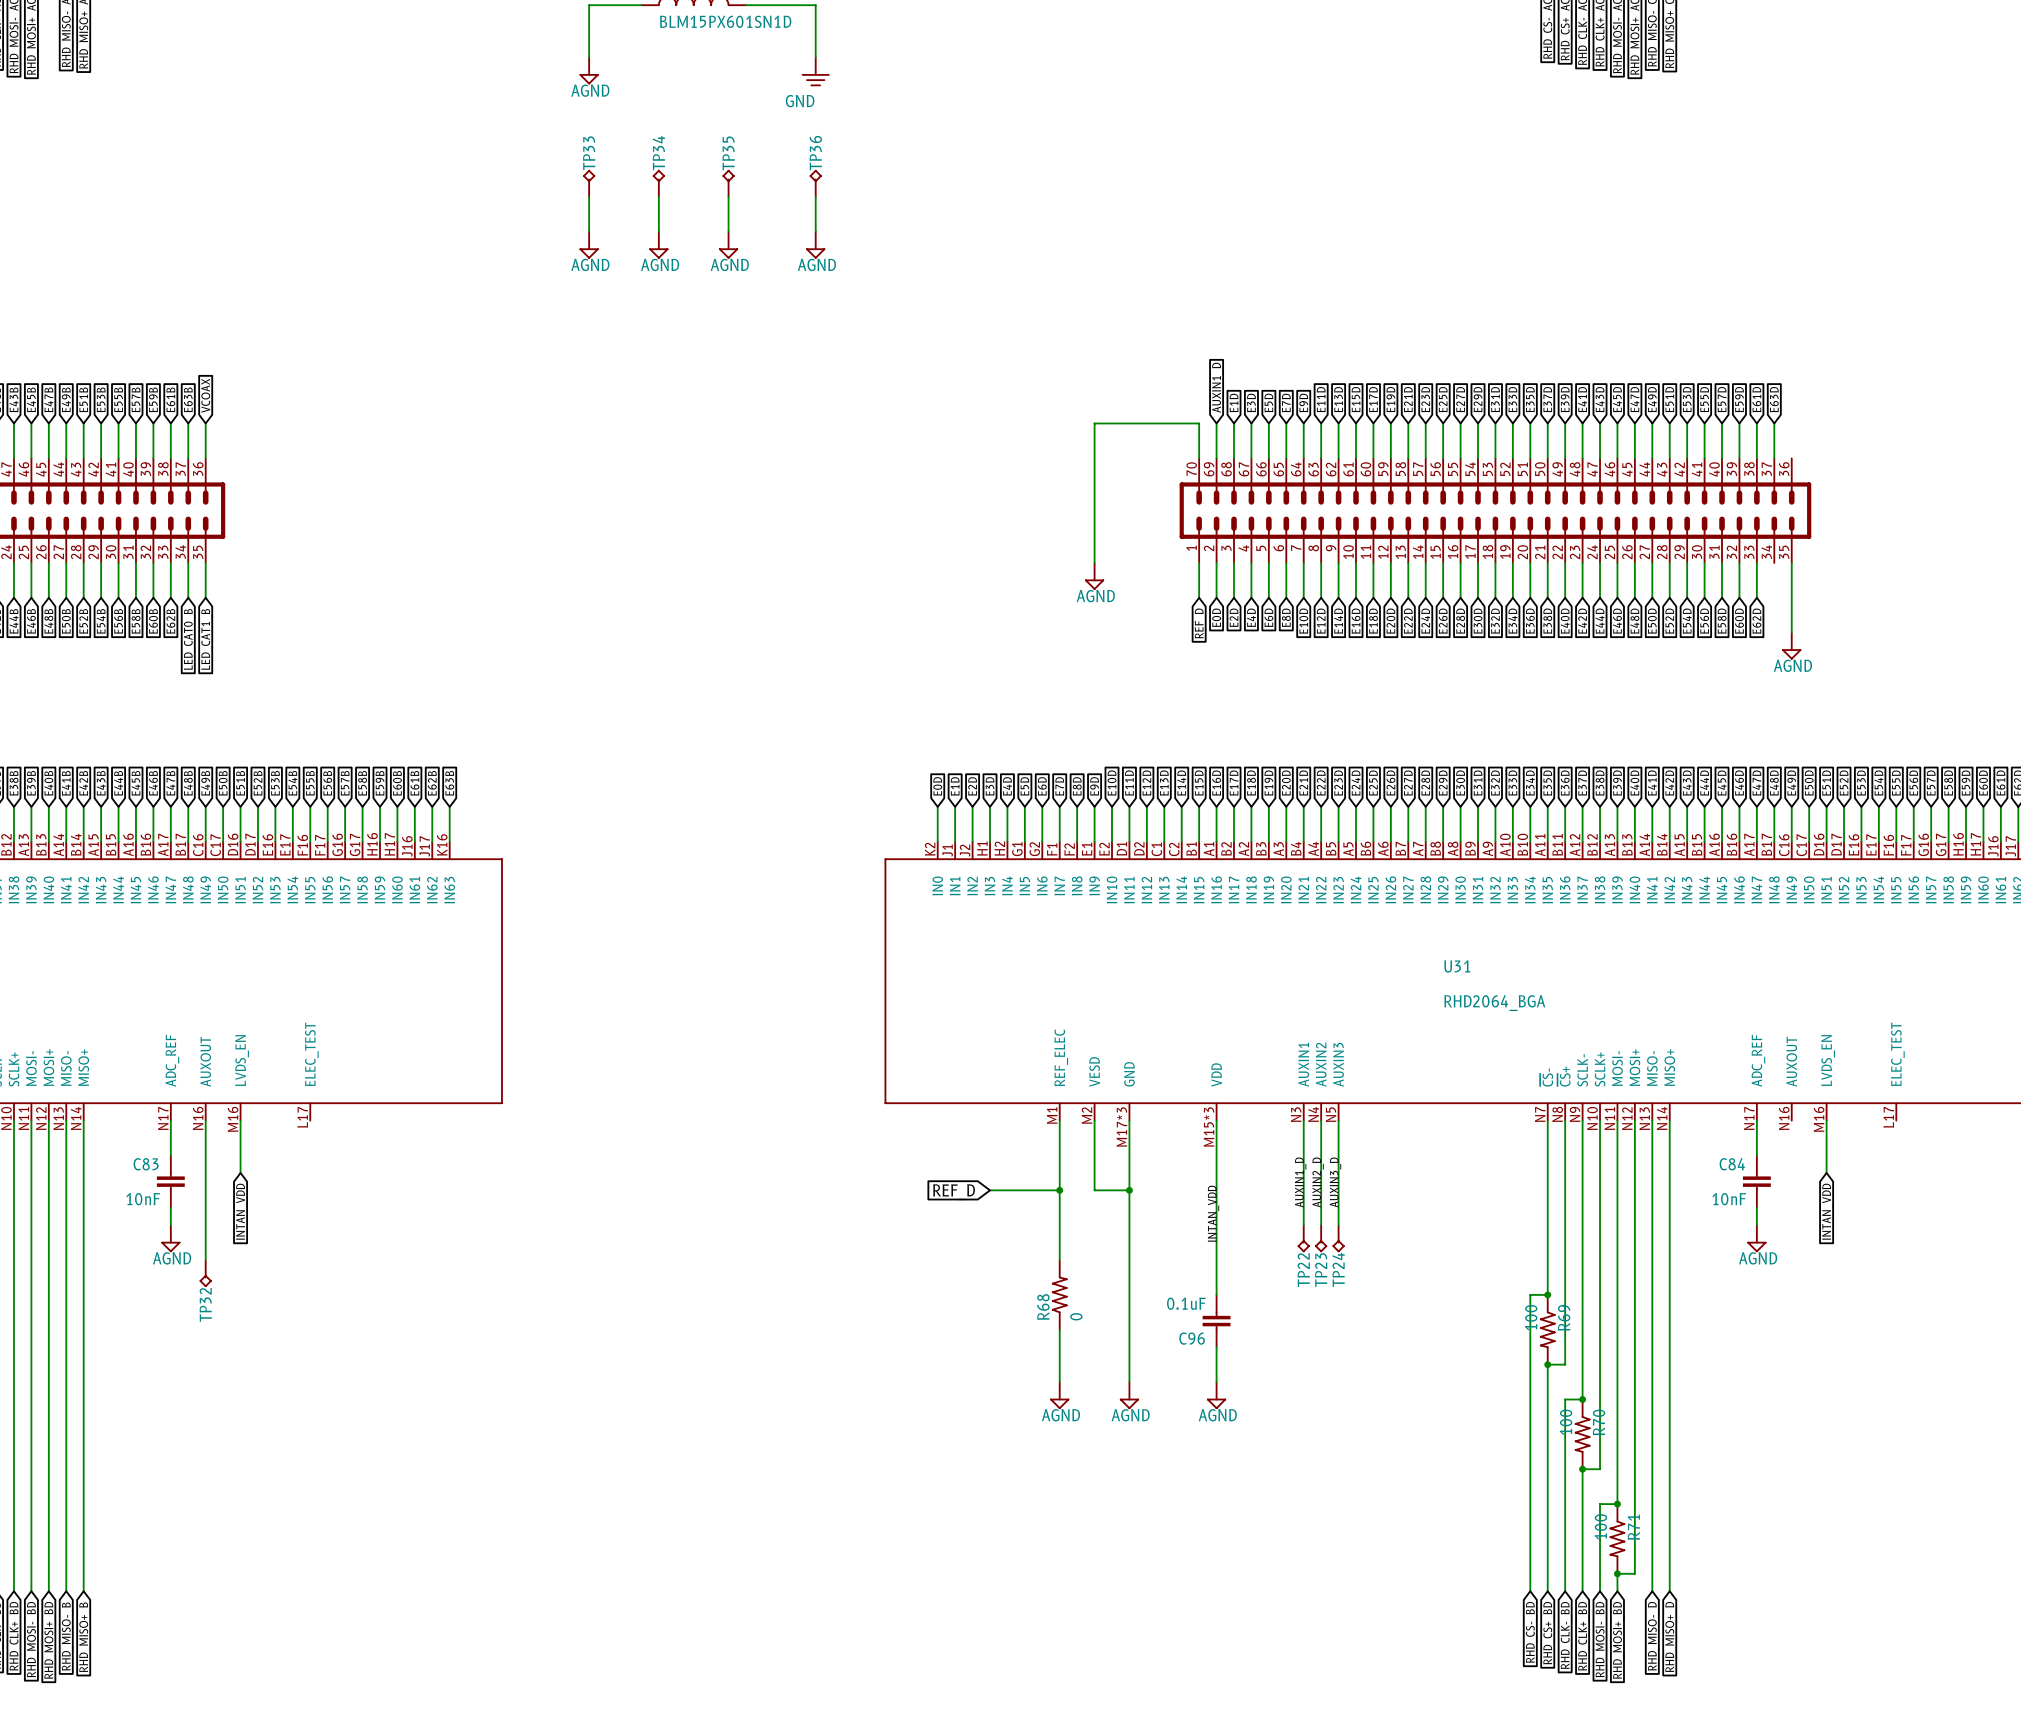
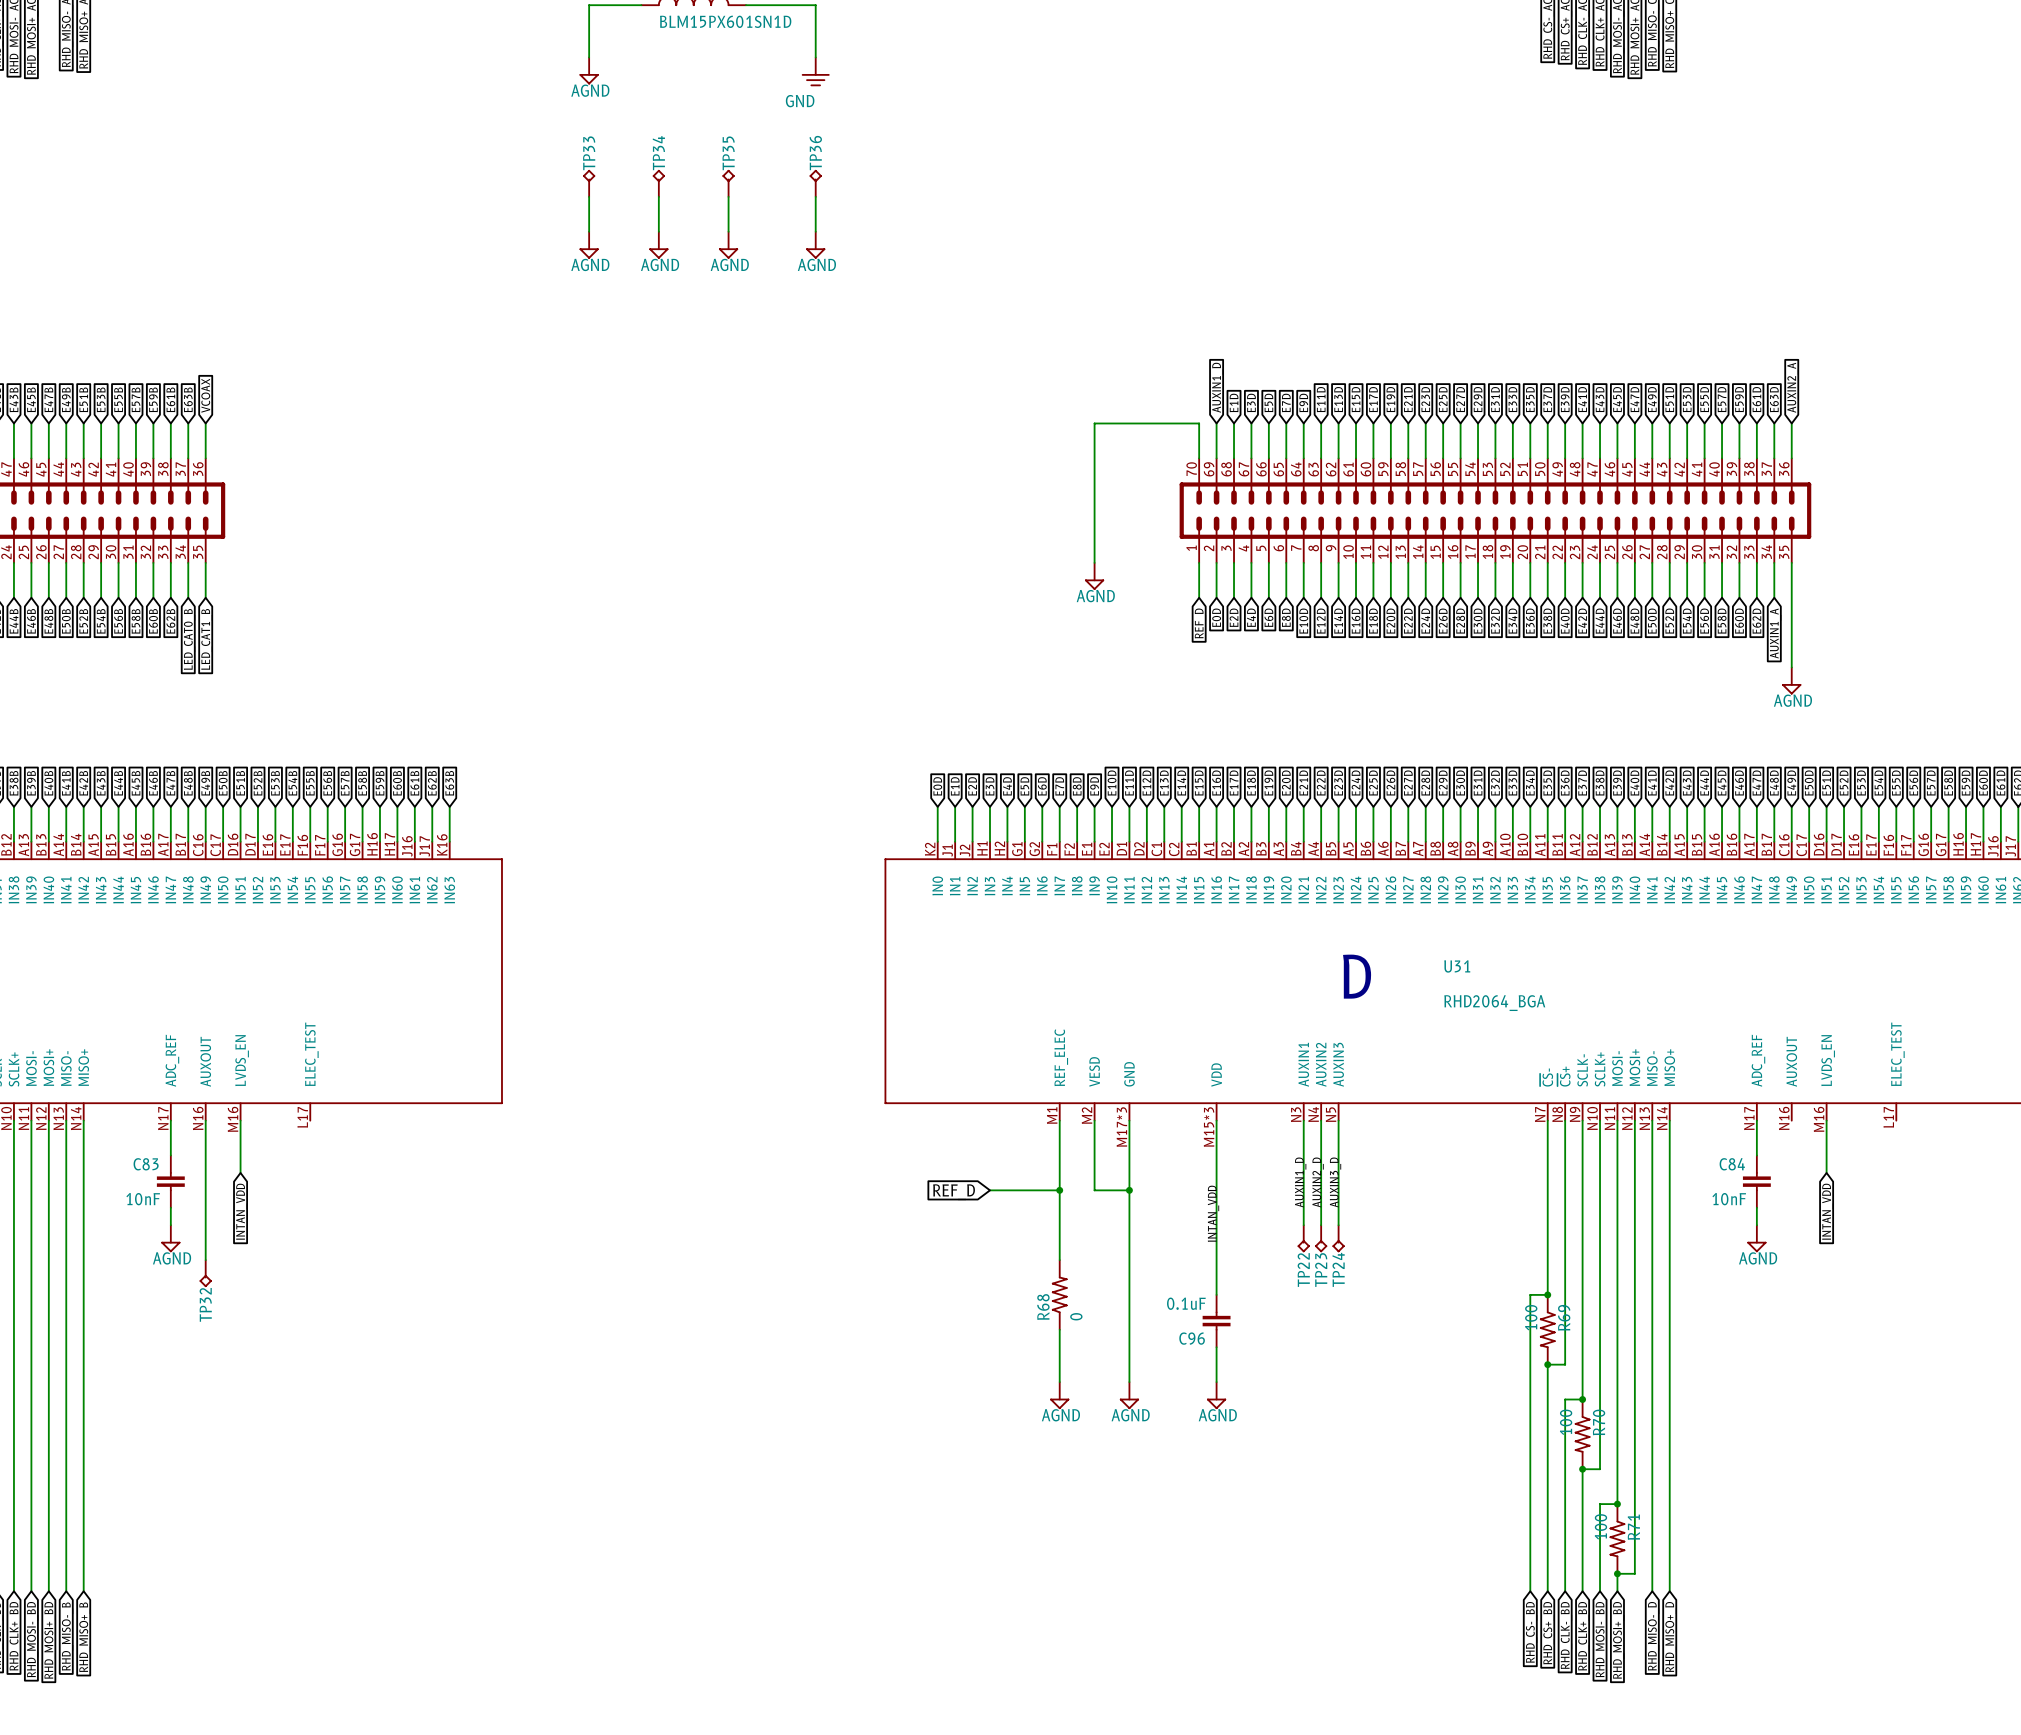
global label: none -> AUXIN2_A (1793, 387)
wire: none -> (1791, 423) (1791, 458)
wire: none -> (1774, 562) (1774, 597)
global label: none -> AUXIN1_A (1775, 633)
power symbol position: AGND (1791, 646) -> AGND (1791, 681)
text: none -> D (1357, 976)

